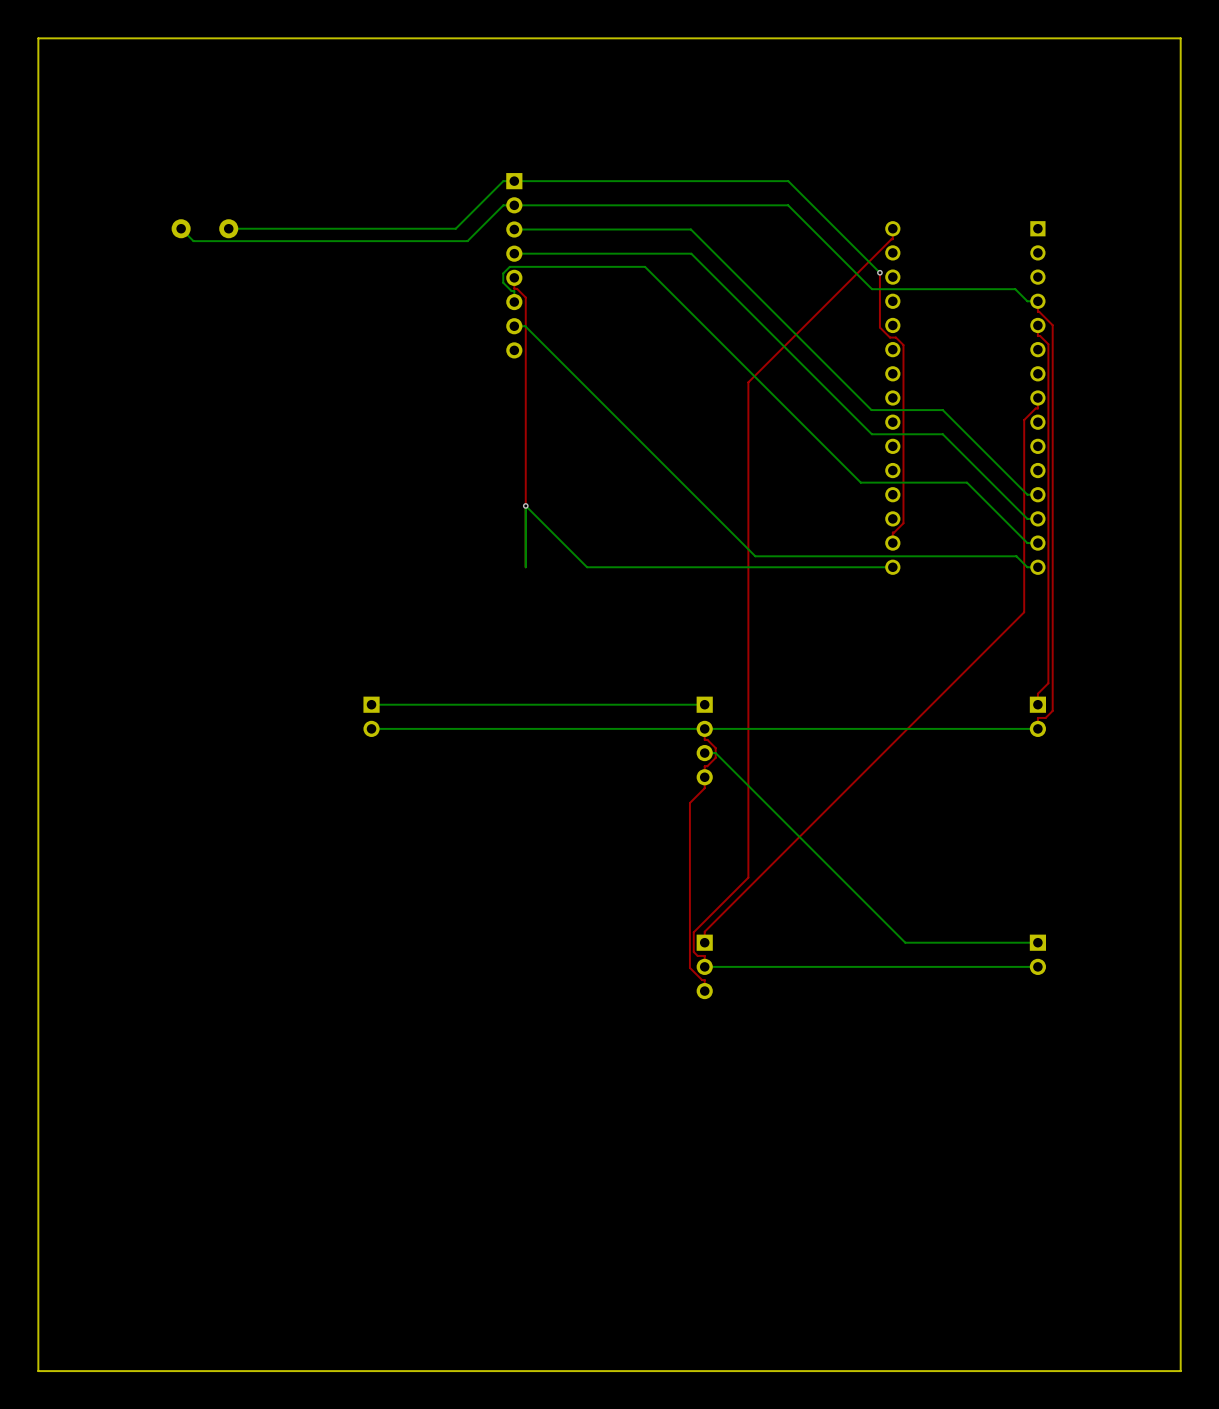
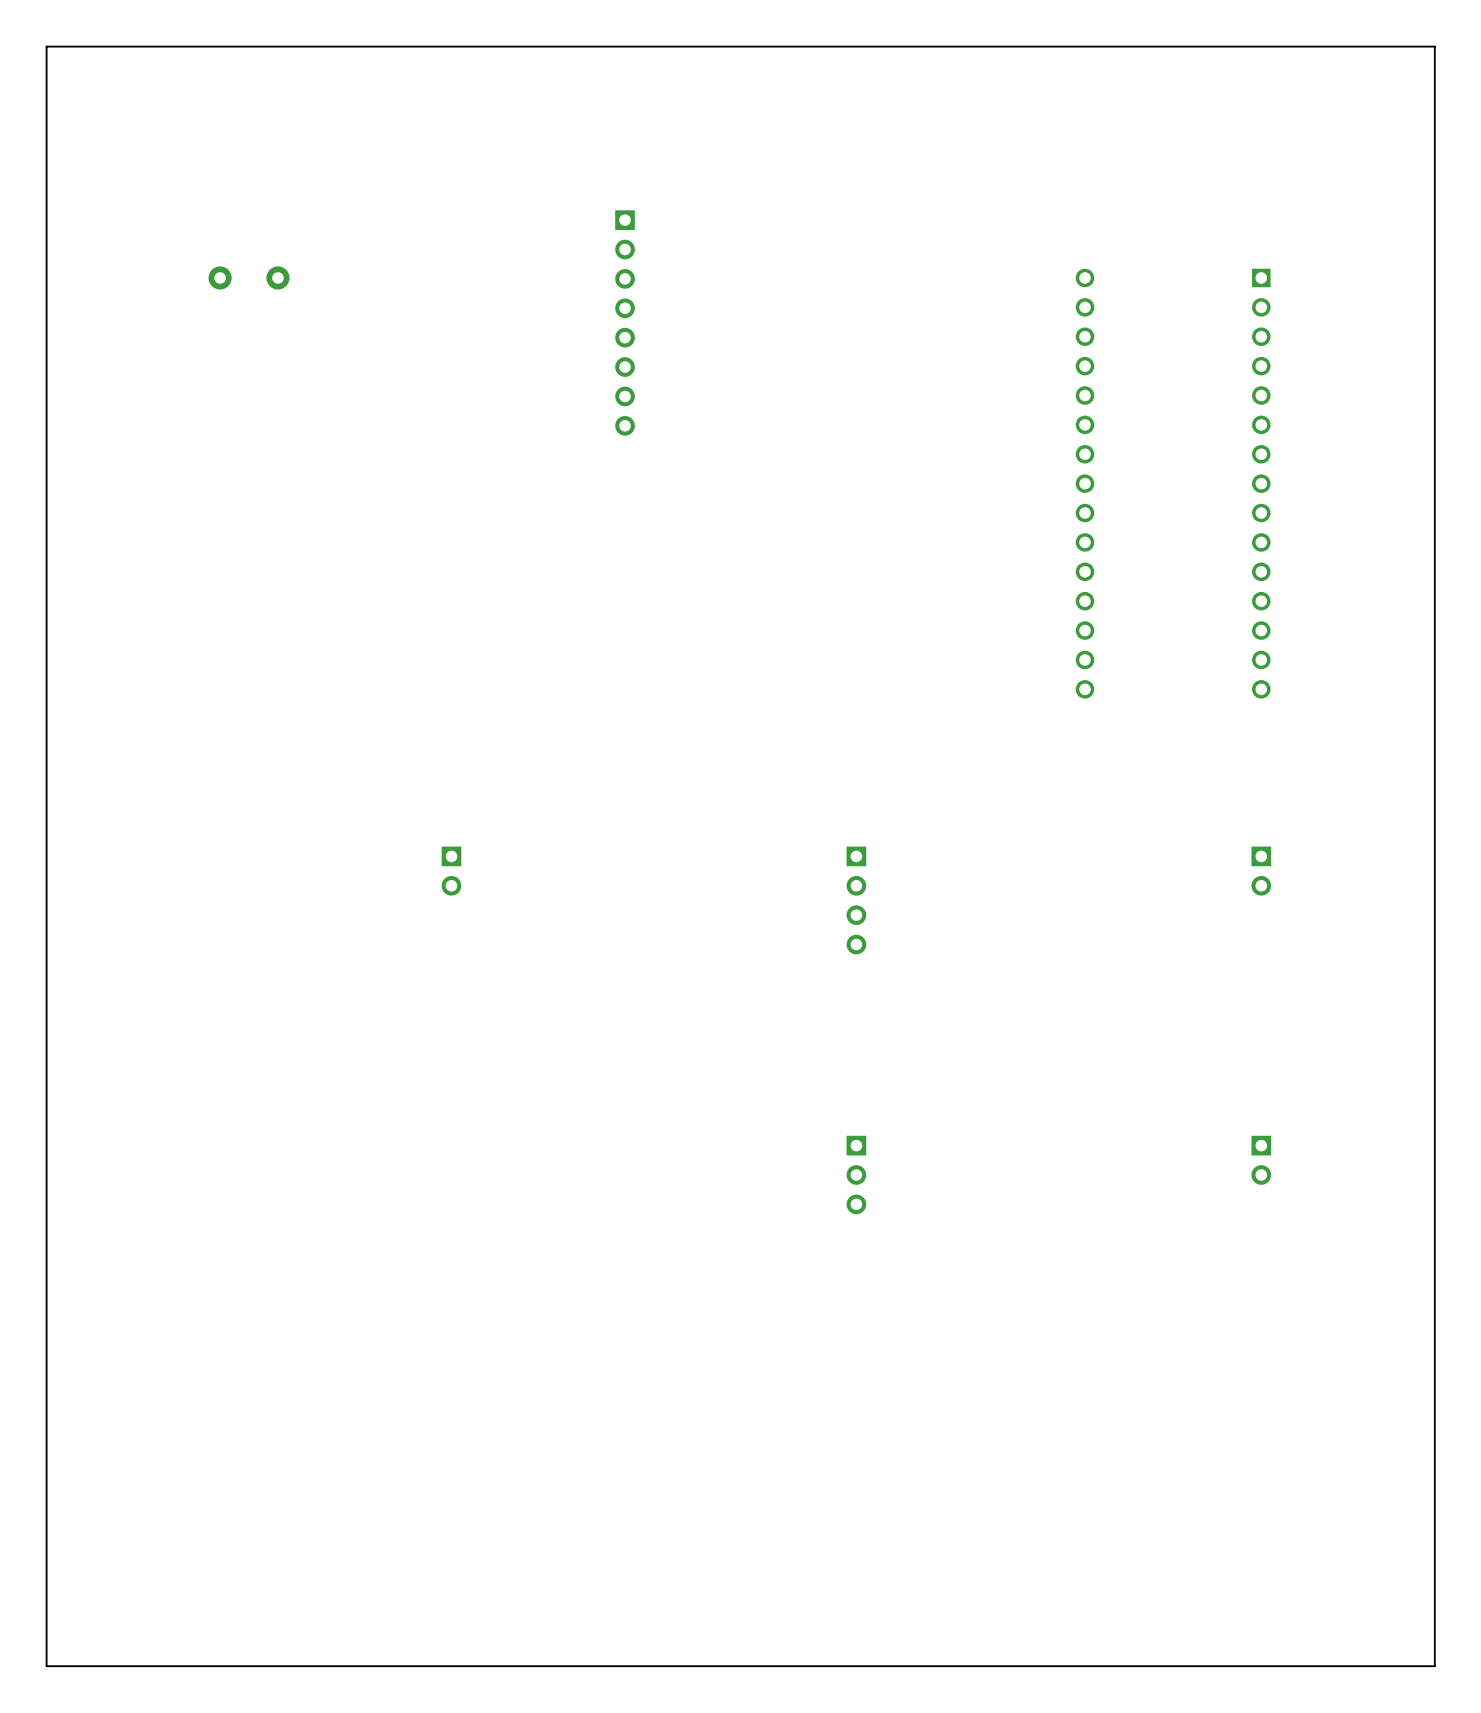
bottom track: (181, 228) (193, 241) (467, 241) (503, 205) (788, 205) (872, 289) (1015, 289) (1027, 301) (1037, 301) -> none
bottom track: (228, 228) (455, 228) (503, 181) (788, 181) (879, 272) -> none
top track: (892, 228) (892, 239) (748, 382) (748, 877) (693, 932) (693, 951) (697, 955) (704, 955) (704, 966) -> none
bottom track: (514, 229) (690, 229) (871, 410) (942, 410) (1027, 494) (1037, 494) -> none
bottom track: (514, 253) (691, 253) (871, 434) (942, 434) (1027, 518) (1037, 518) -> none
top track: (879, 272) (879, 327) (890, 337) (895, 337) (903, 345) (903, 523) (892, 532) (892, 543) -> none
via: (879, 272) -> none
top track: (514, 277) (514, 288) (517, 288) (525, 297) (525, 567) -> none
top track: (1037, 301) (1037, 311) (1052, 325) (1052, 710) (1045, 717) (1037, 717) (1037, 728) -> none
bottom track: (514, 302) (514, 291) (511, 291) (503, 282) (503, 273) (509, 266) (645, 266) (860, 482) (966, 482) (1027, 543) (1037, 543) -> none
top track: (1037, 325) (1037, 335) (1048, 344) (1048, 683) (1037, 693) (1037, 704) -> none
bottom track: (514, 326) (525, 326) (755, 556) (1016, 556) (1027, 567) (1037, 567) -> none
top track: (1037, 398) (1037, 408) (1024, 420) (1024, 612) (704, 931) (704, 942) -> none
via: (525, 505) -> none
bottom track: (892, 567) (587, 567) (525, 505) (525, 567) -> none
bottom track: (704, 704) (371, 704) -> none
top track: (704, 728) (704, 739) (707, 739) (715, 748) (715, 757) (707, 766) (704, 766) (704, 788) (689, 803) (689, 967) (702, 980) (704, 980) (704, 991) -> none
bottom track: (1037, 728) (371, 728) -> none
bottom track: (704, 753) (715, 753) (905, 942) (1037, 942) -> none
bottom track: (1037, 966) (704, 966) -> none

